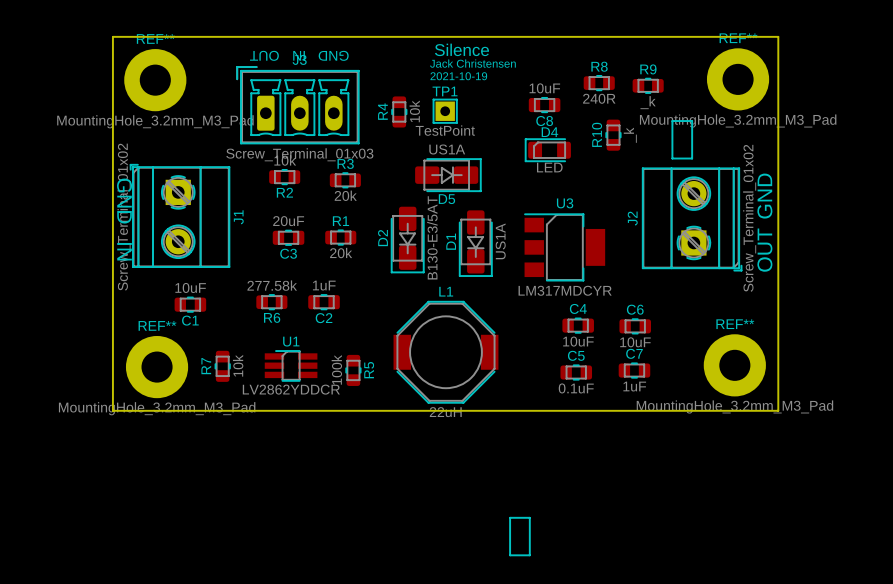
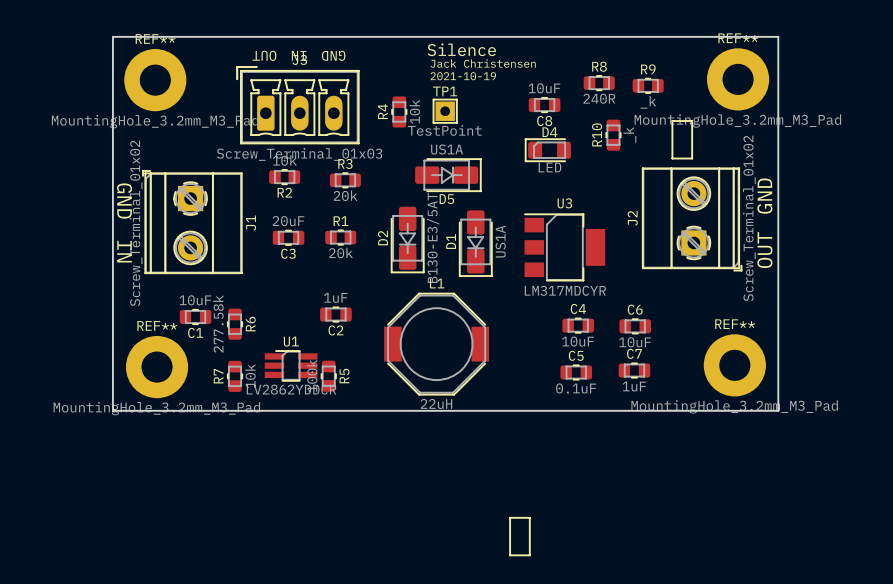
J1 position: (180, 215) -> (192, 222)
R6 value position: 277.58k (272, 285) -> 277.58k (218, 323)
R6 rotation: 0° (271, 302) -> 90° clockwise (235, 324)
R6 position: (271, 302) -> (235, 324)
C2 position: (324, 302) -> (335, 314)
C1 position: (190, 304) -> (195, 316)
R6 name position: R6 (272, 317) -> R6 (250, 324)
L1 position: (445, 352) -> (436, 344)
R7 position: (222, 366) -> (235, 376)
R5 position: (353, 370) -> (328, 376)

